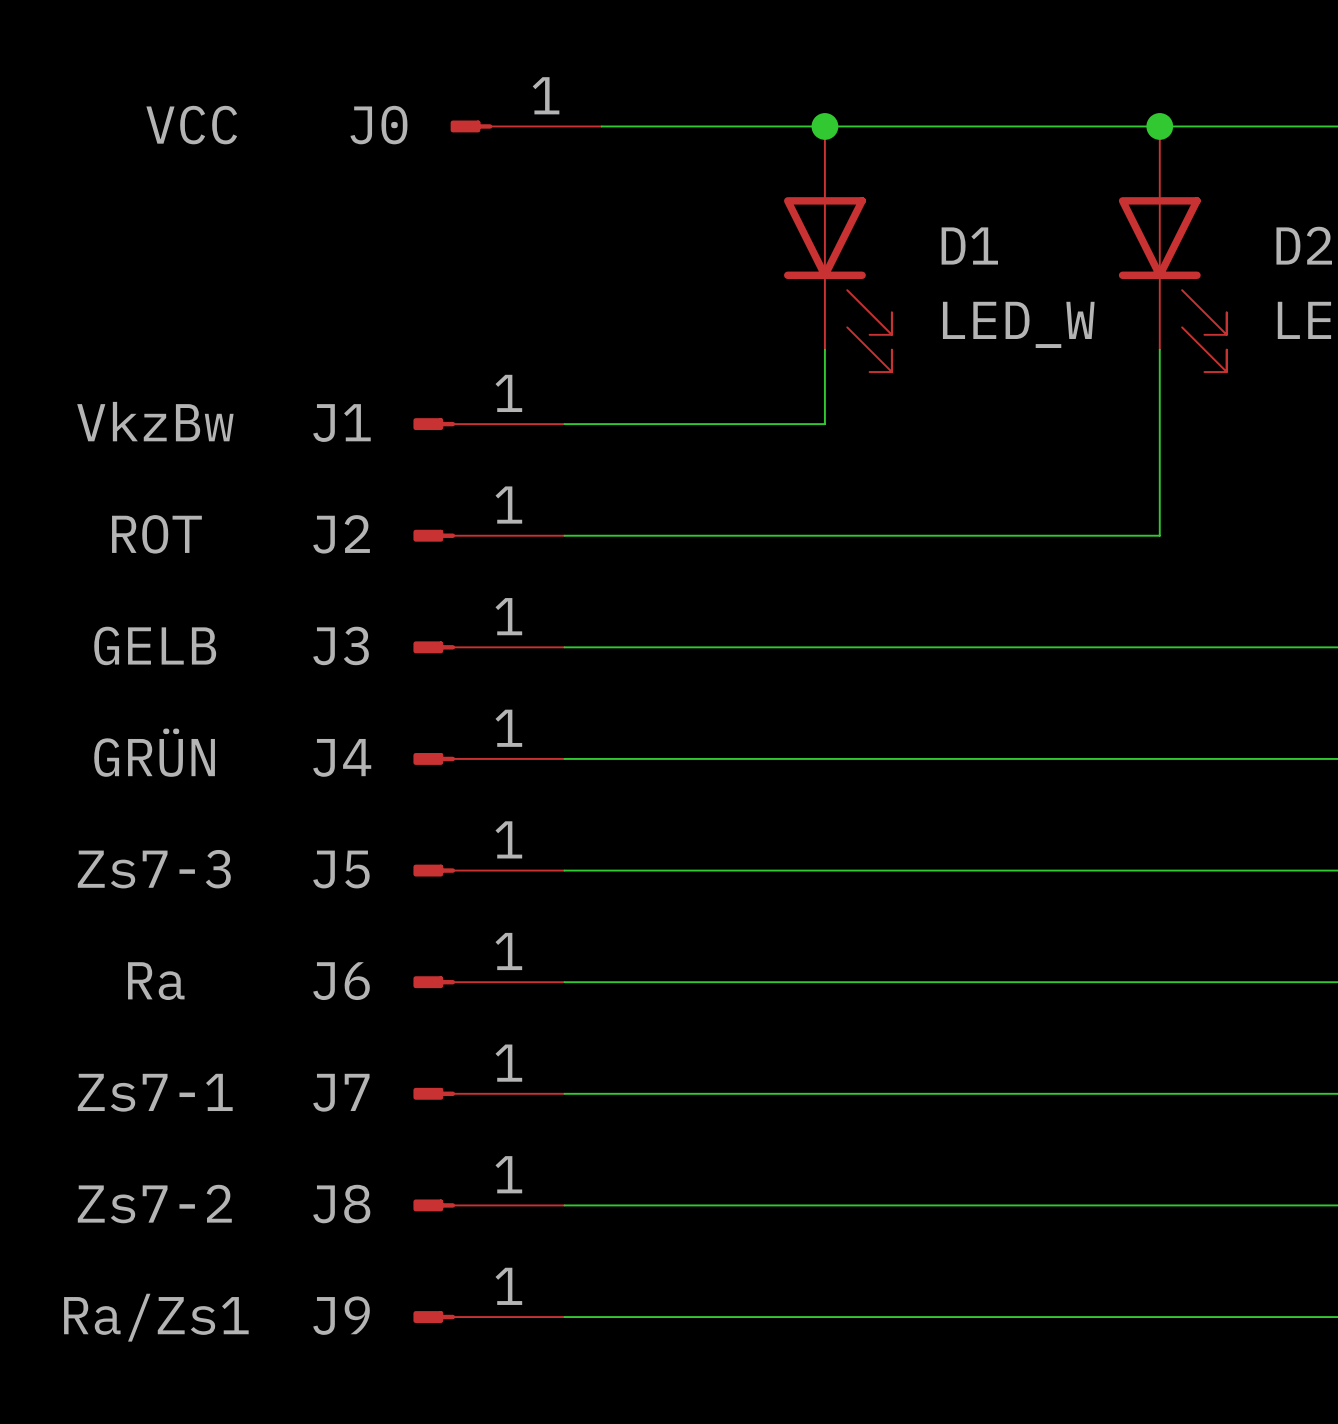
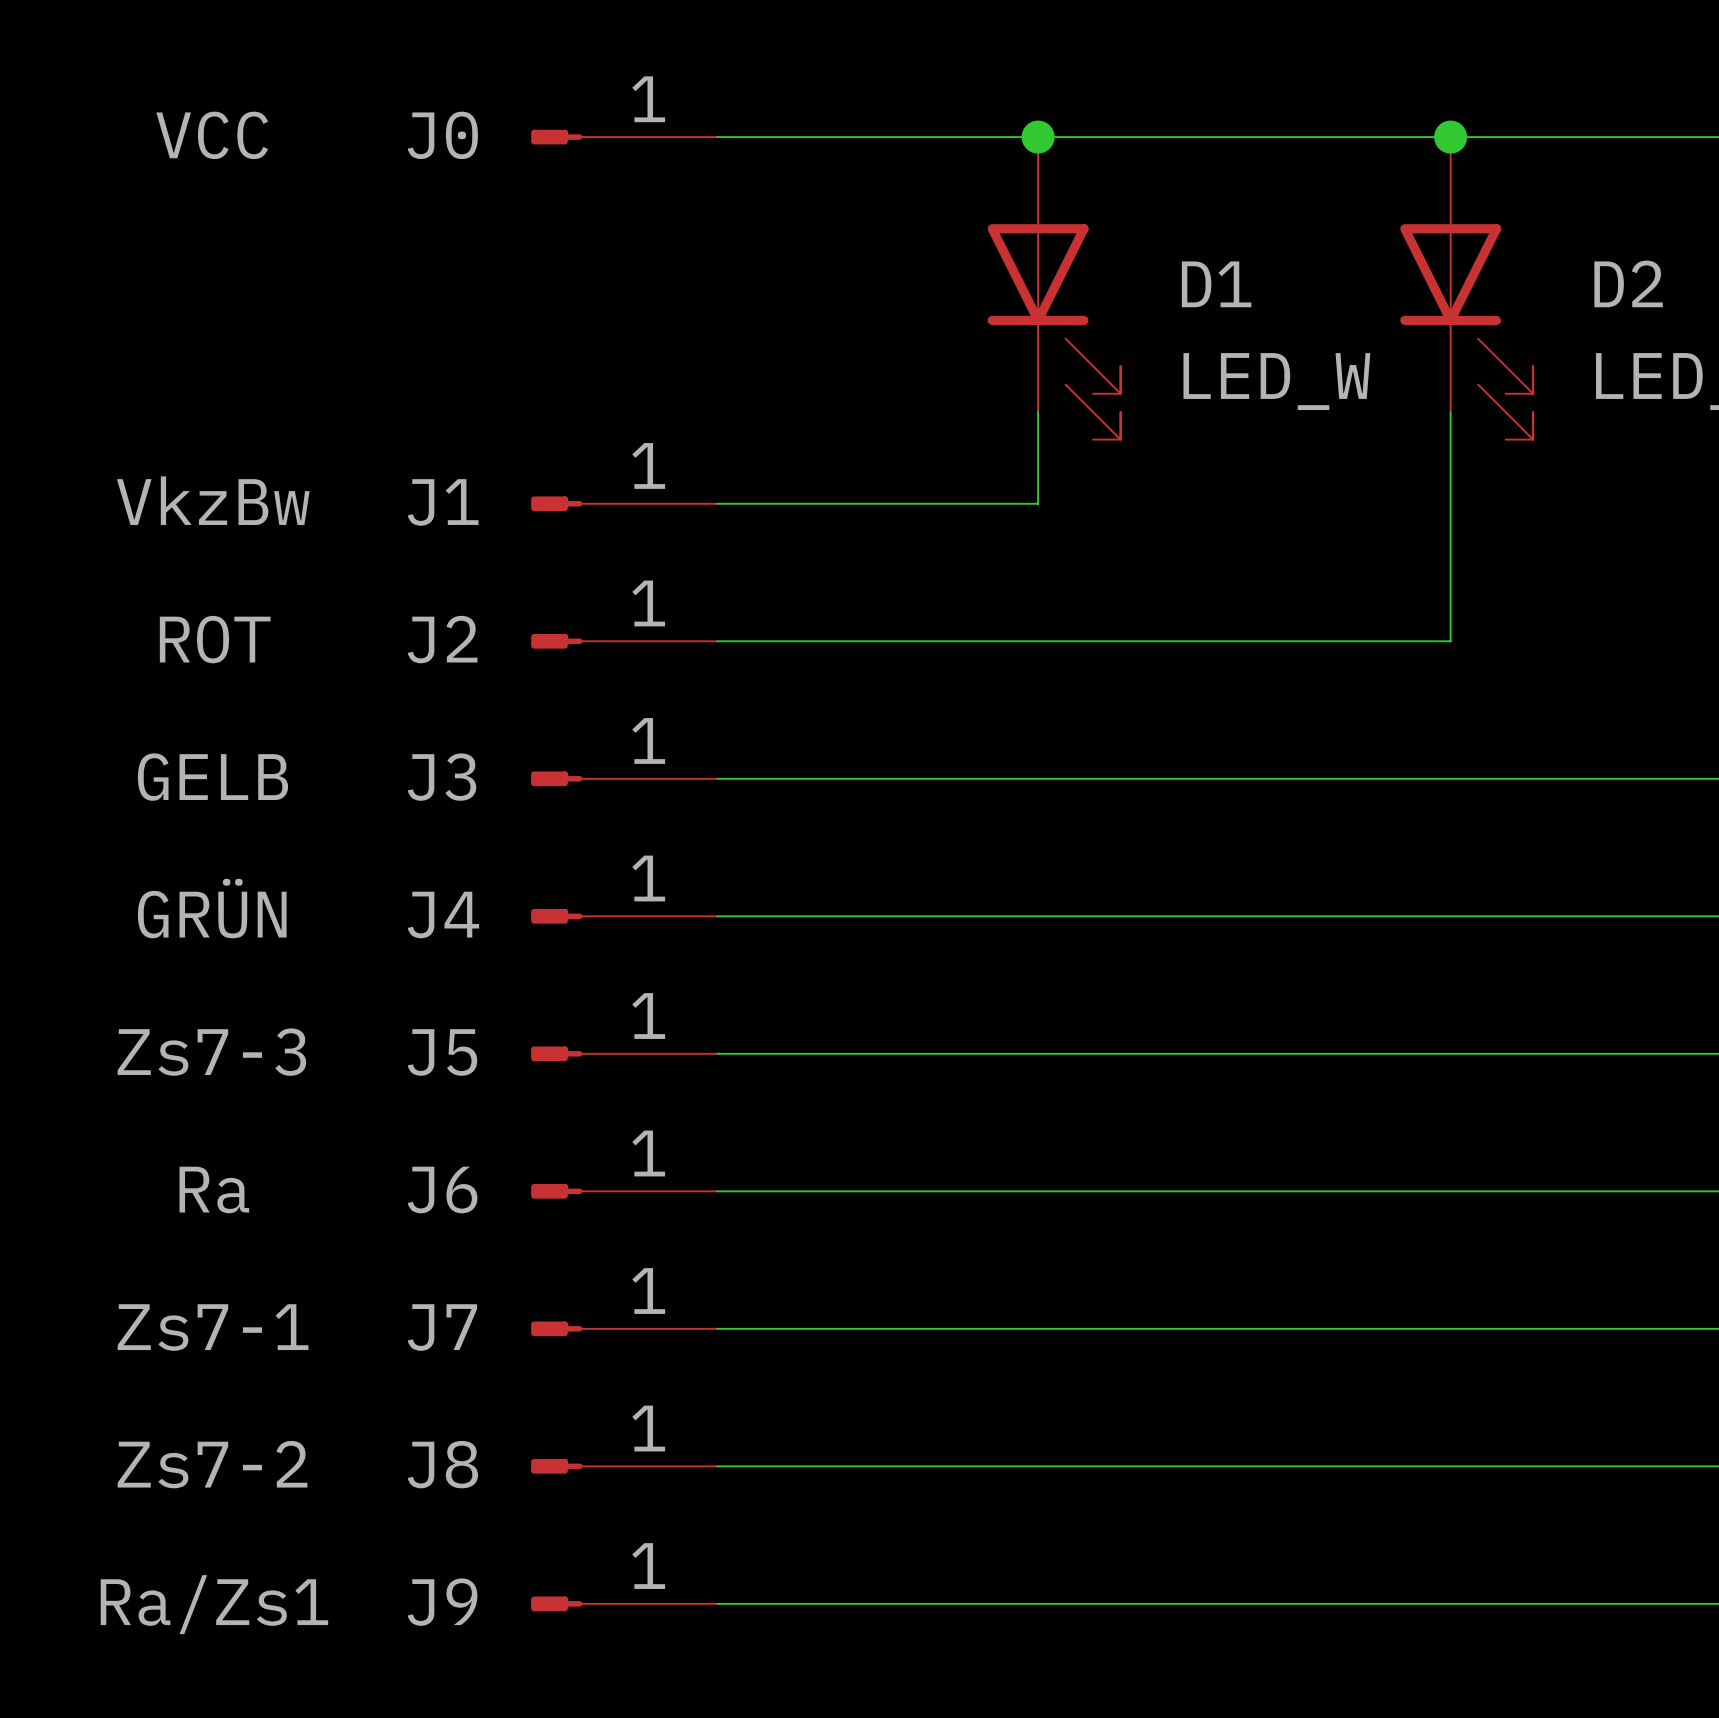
J0 position: (526, 126) -> (624, 137)

